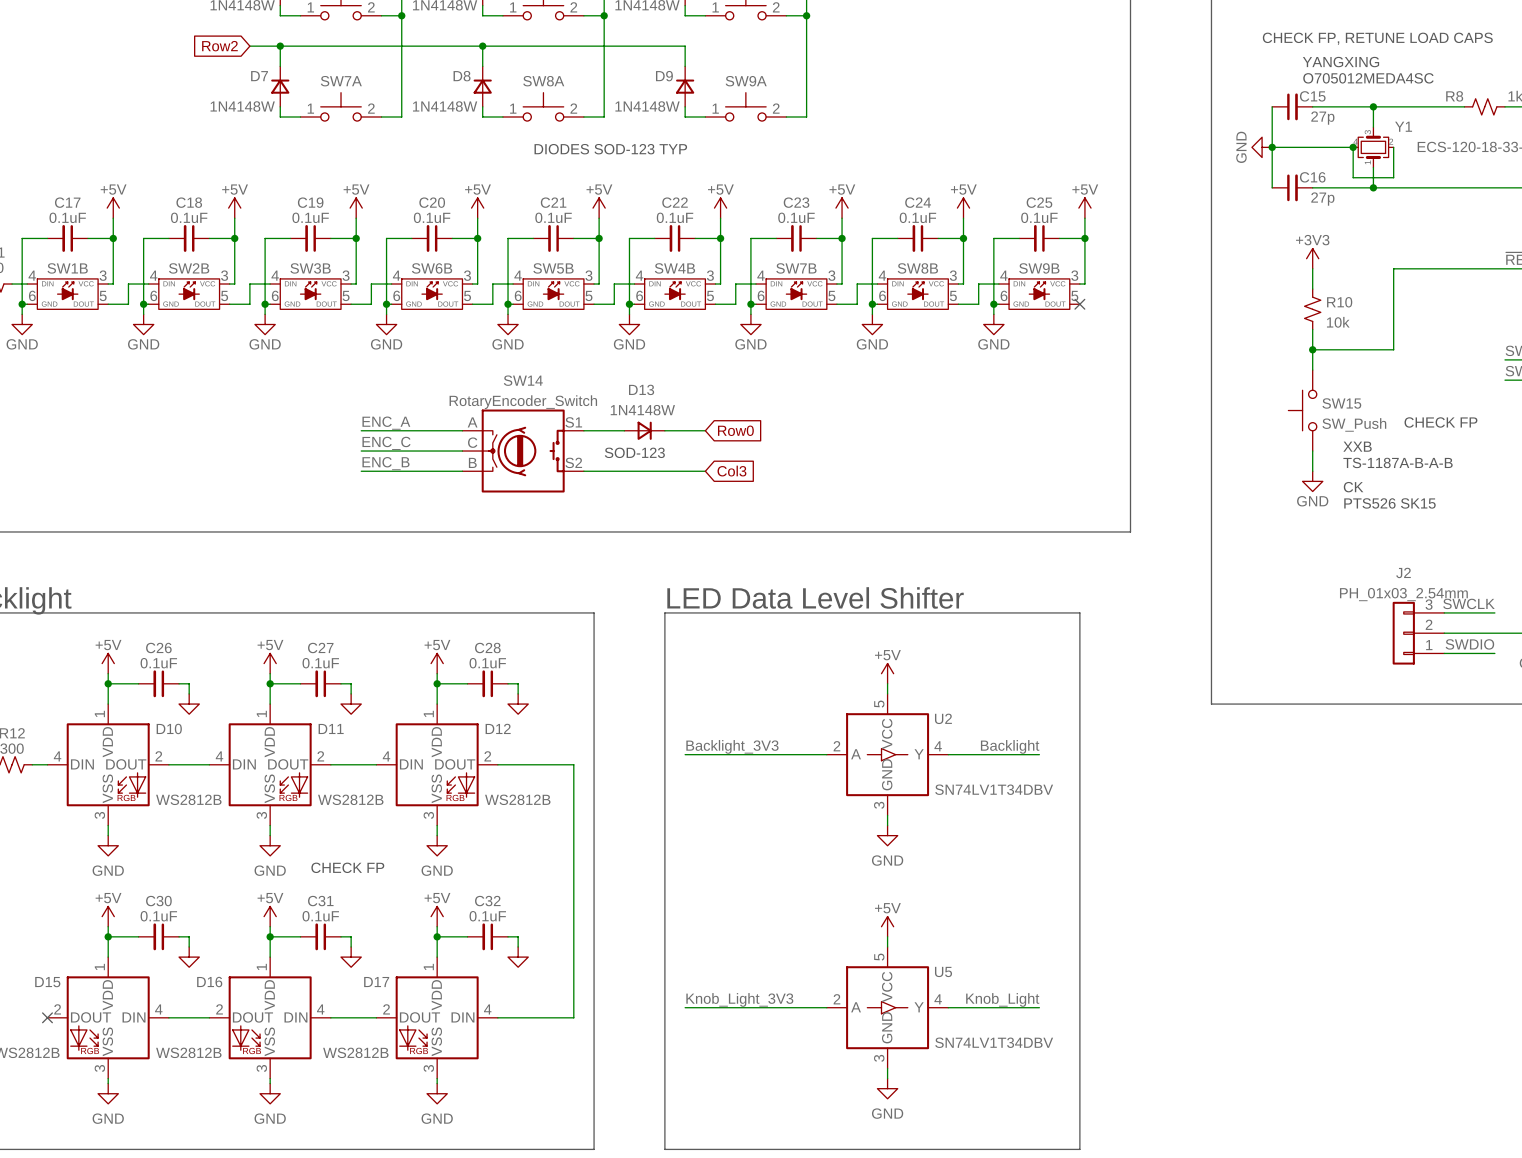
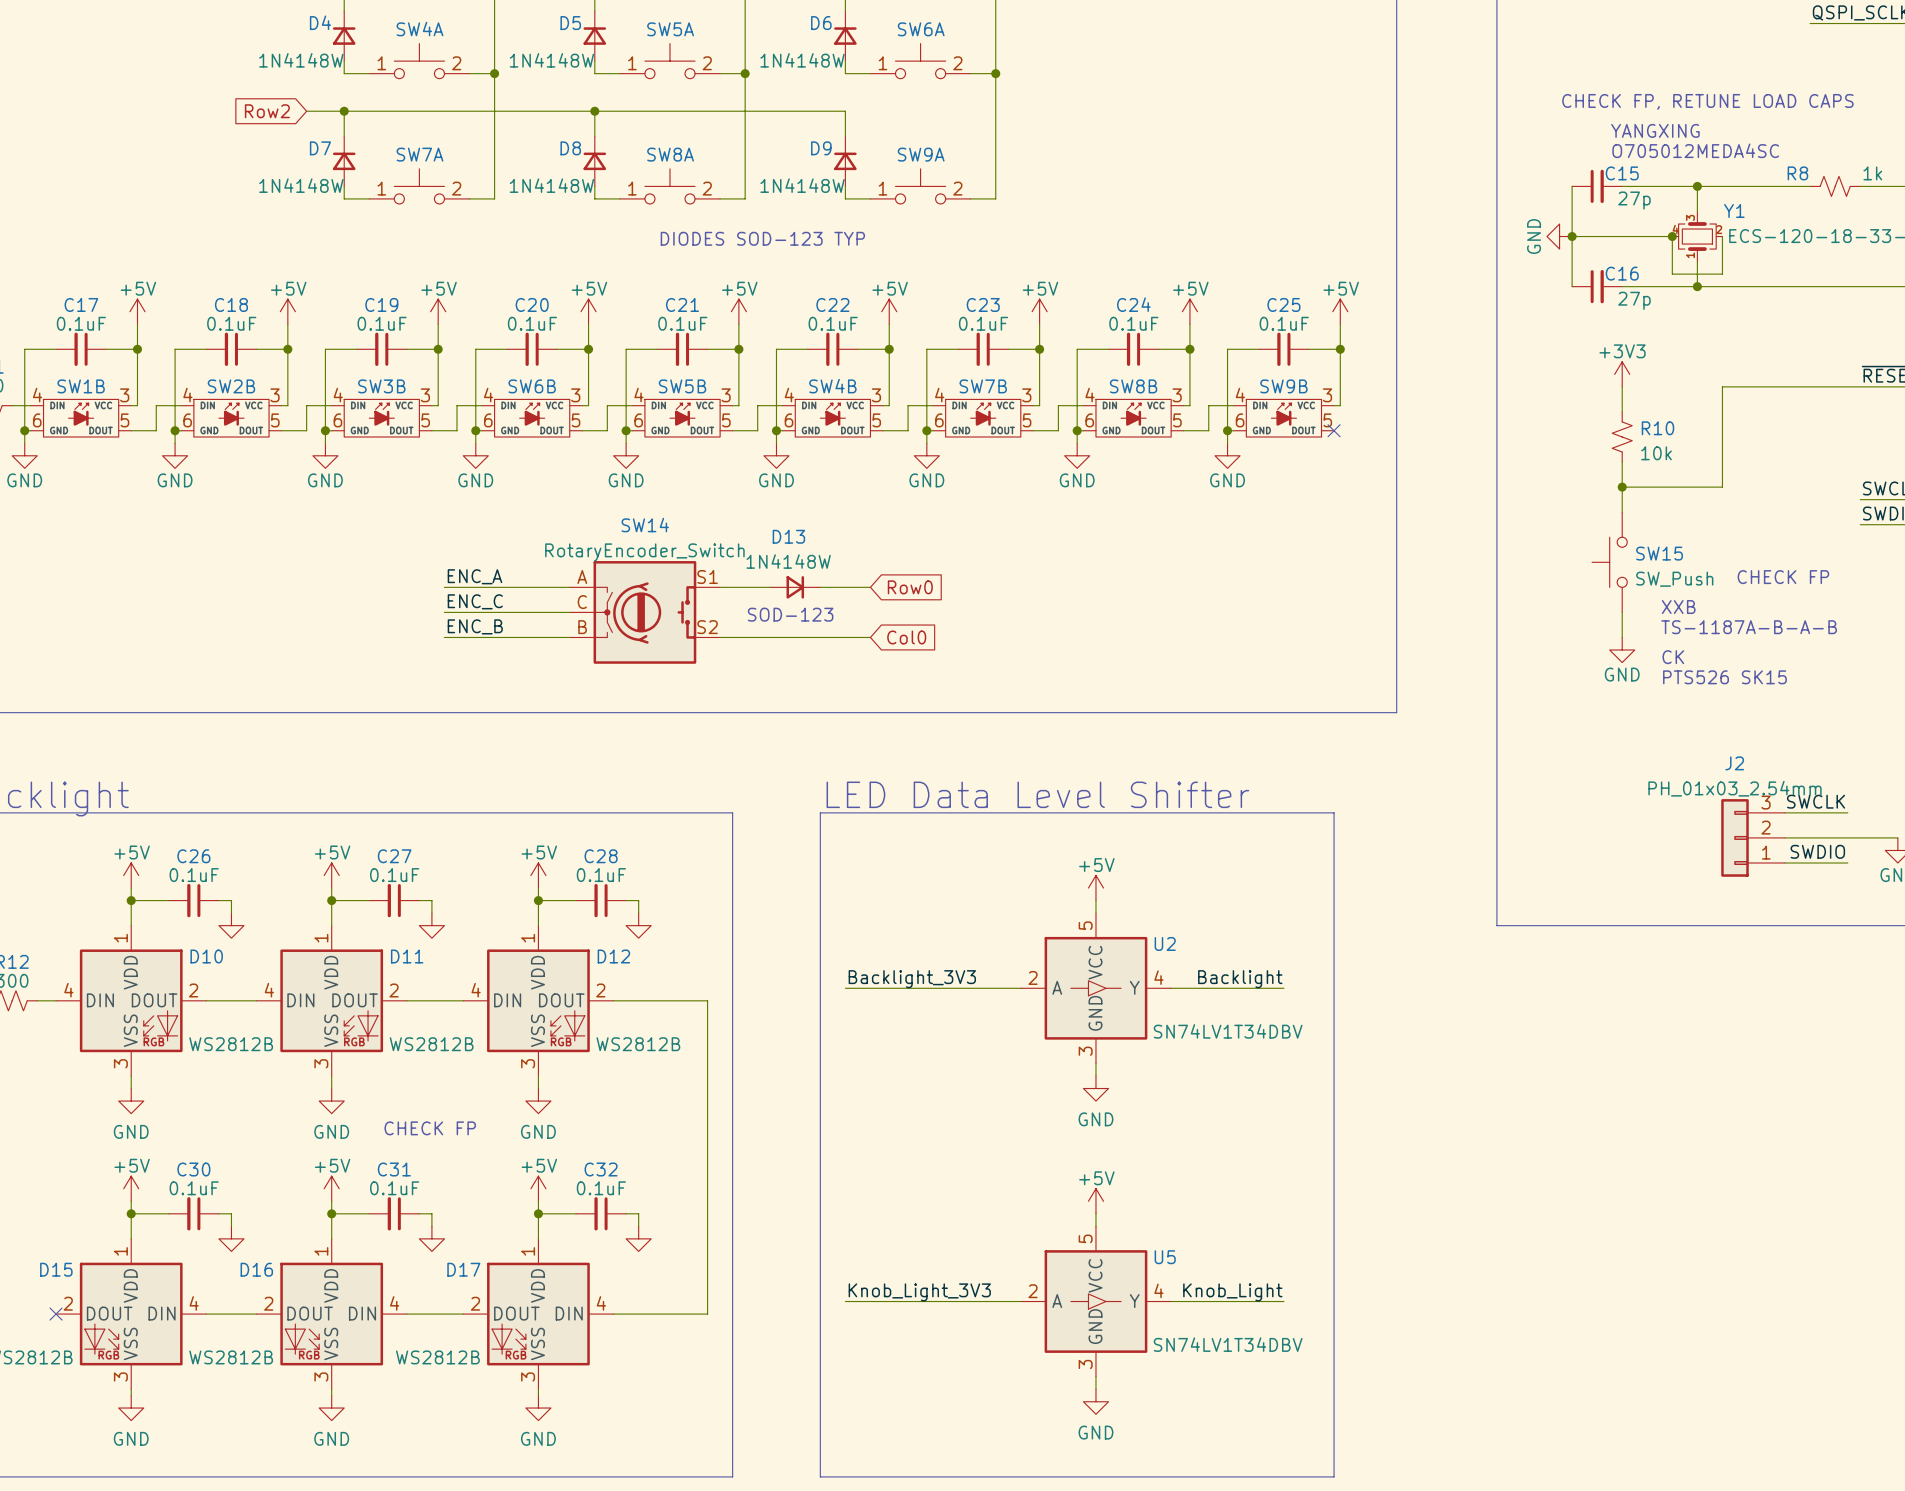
global label: Col3 (731, 471) -> Col0 (906, 637)

